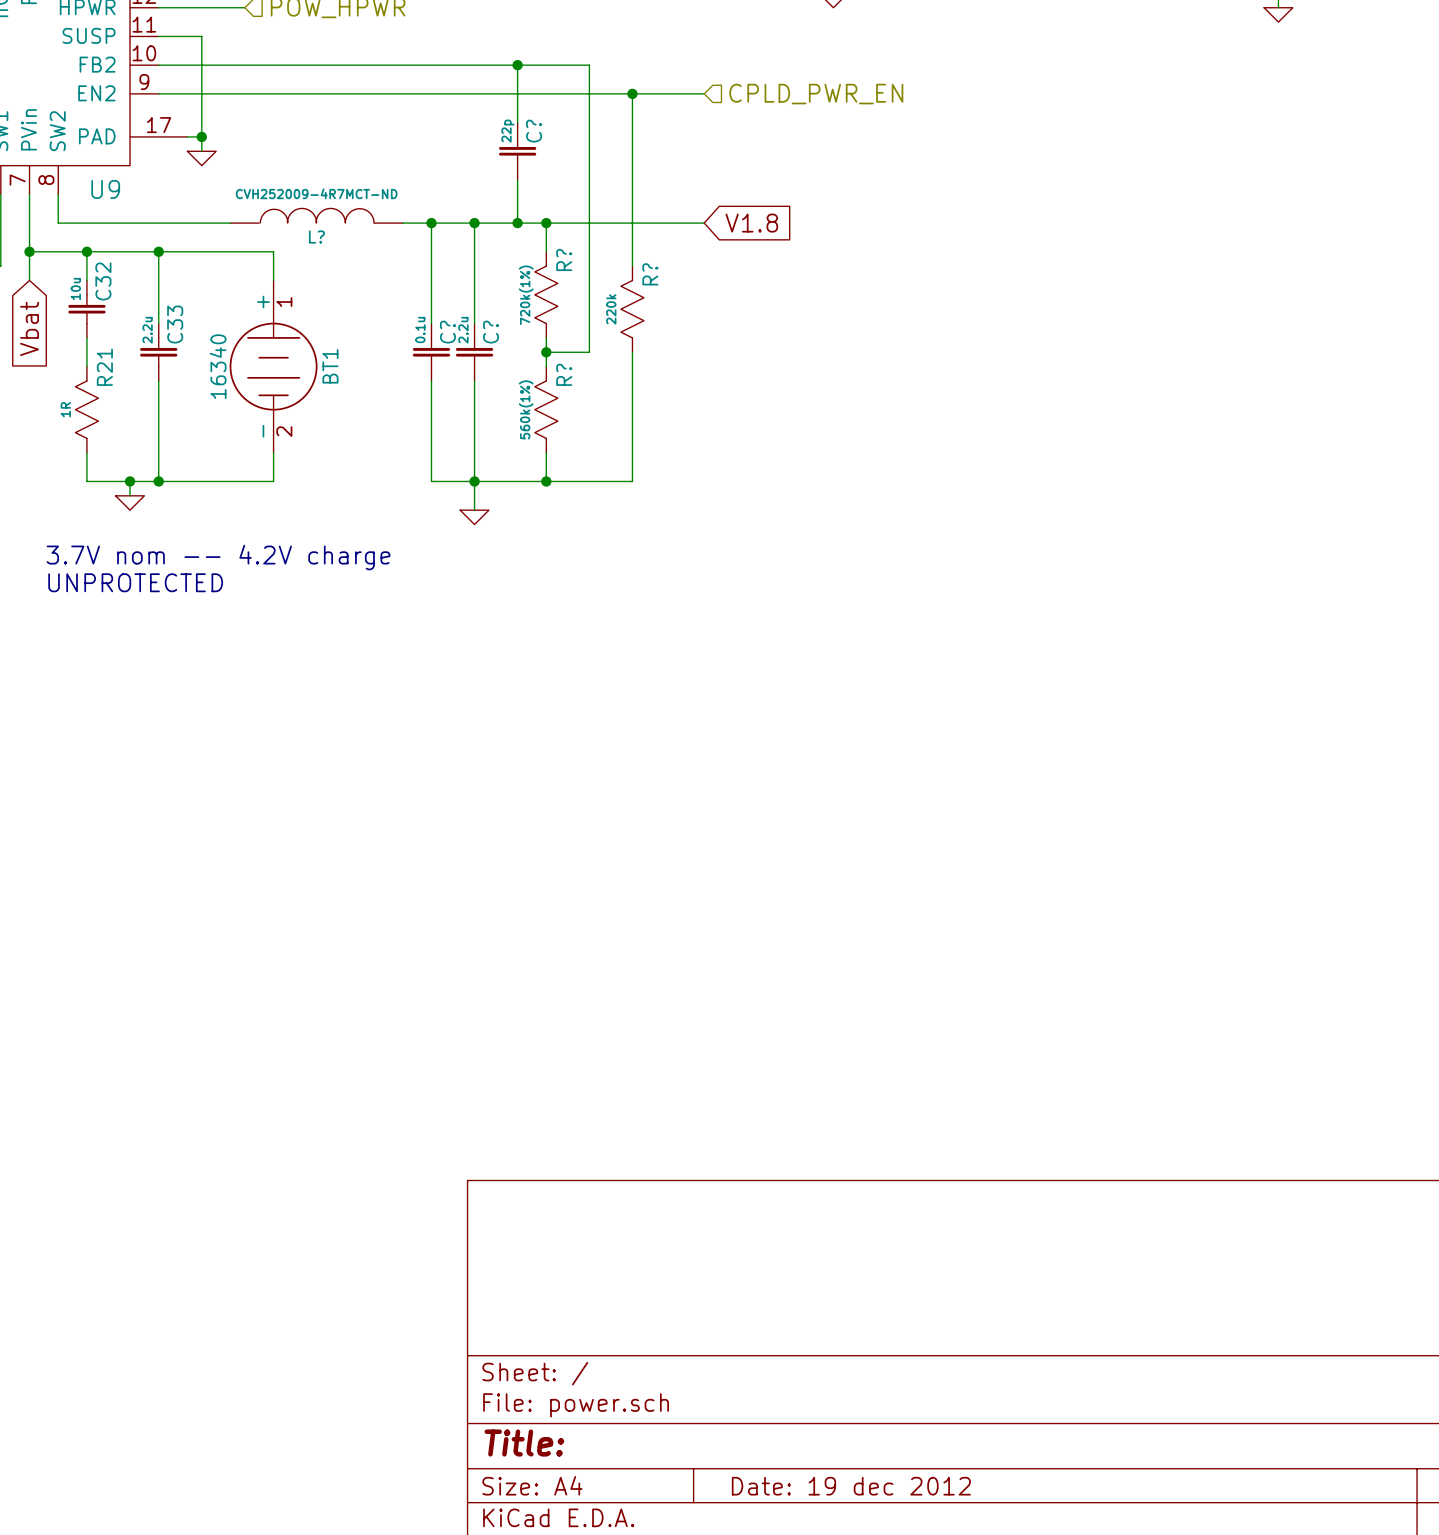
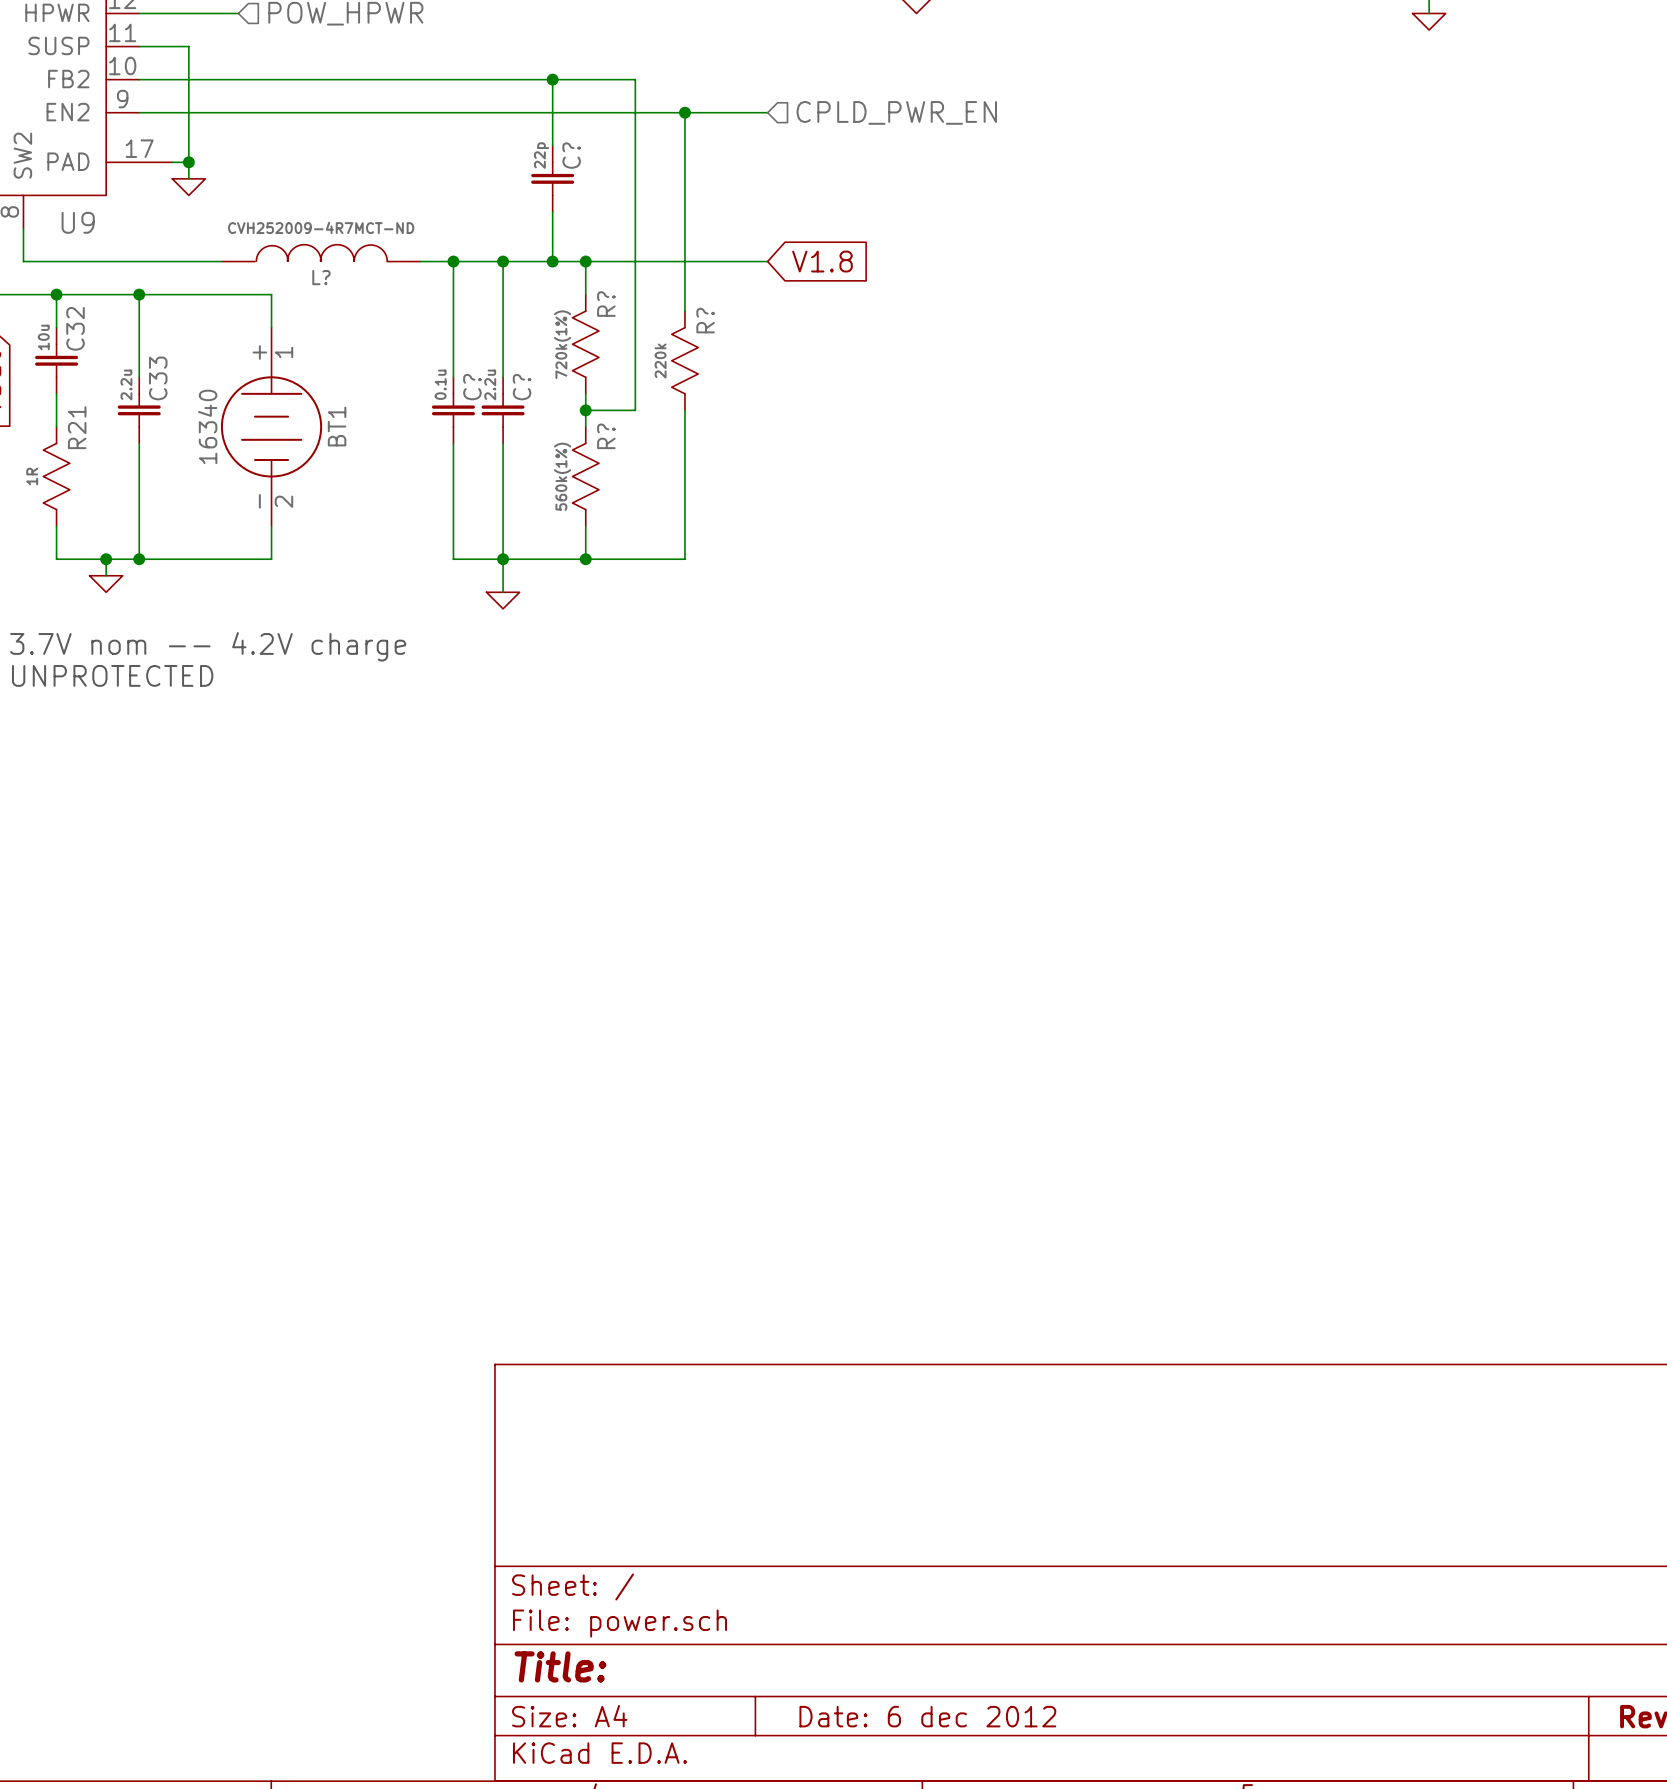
title block: Date: 19 dec 2012 (851, 1486) -> Date: 6 dec 2012 (927, 1716)

